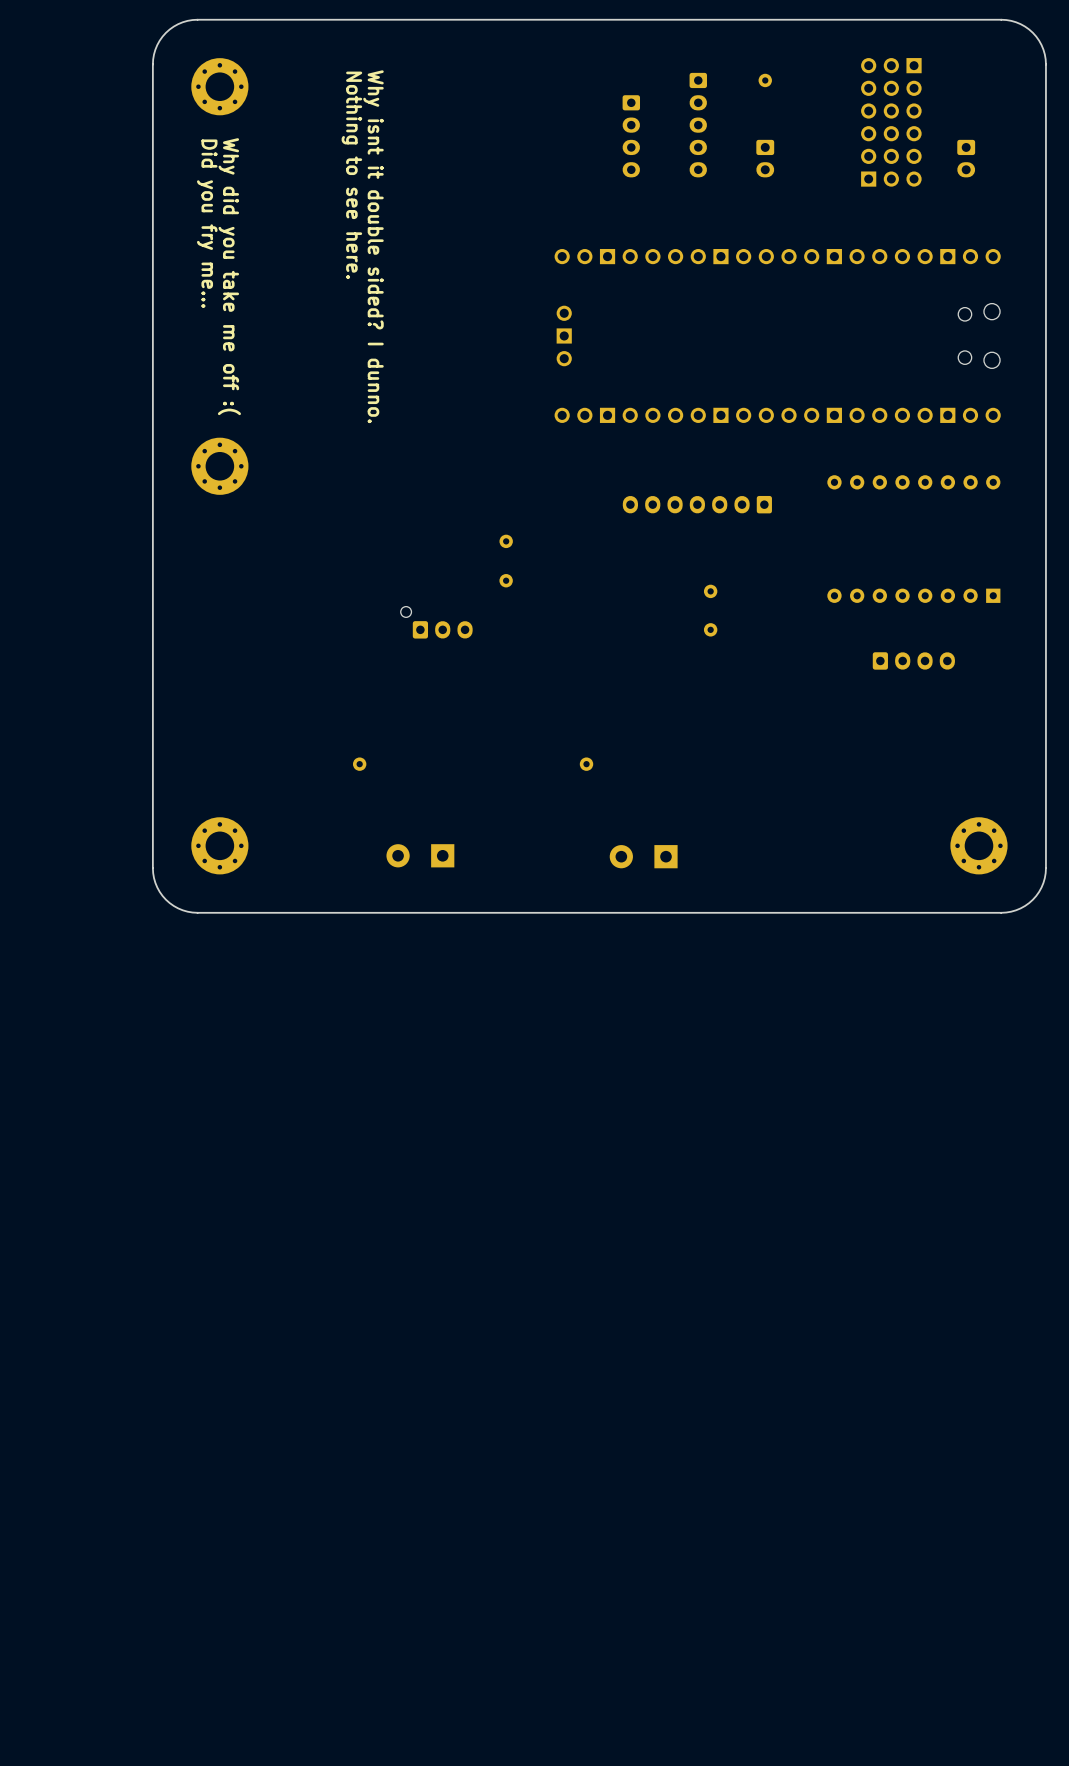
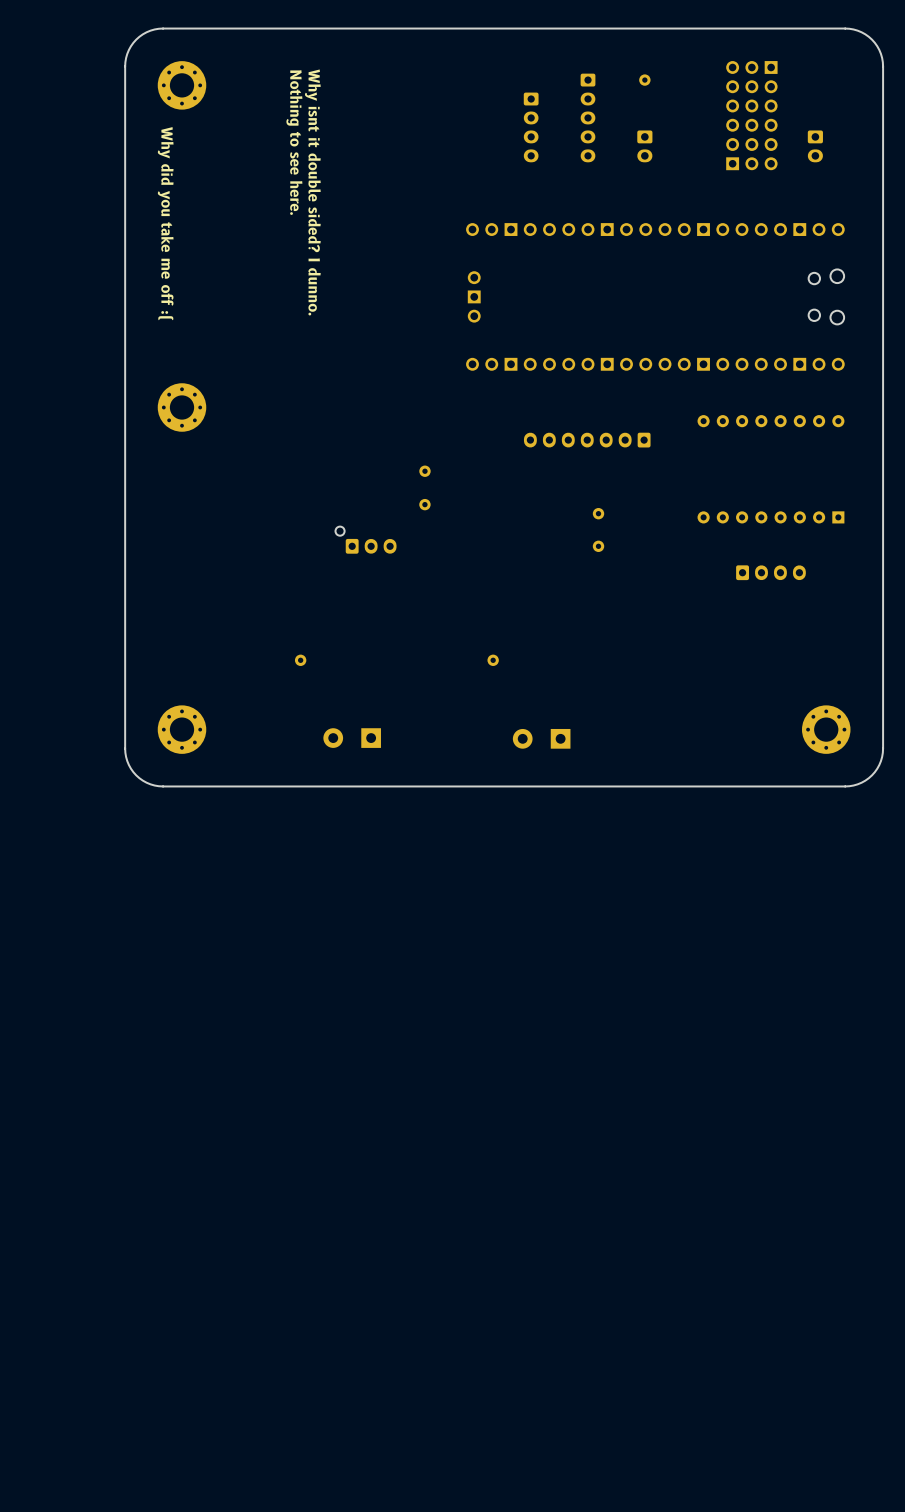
text: Did you fry me... (207, 223) -> Why did you take me off :( (165, 223)
text: Why did you take me off :( (229, 276) -> none

